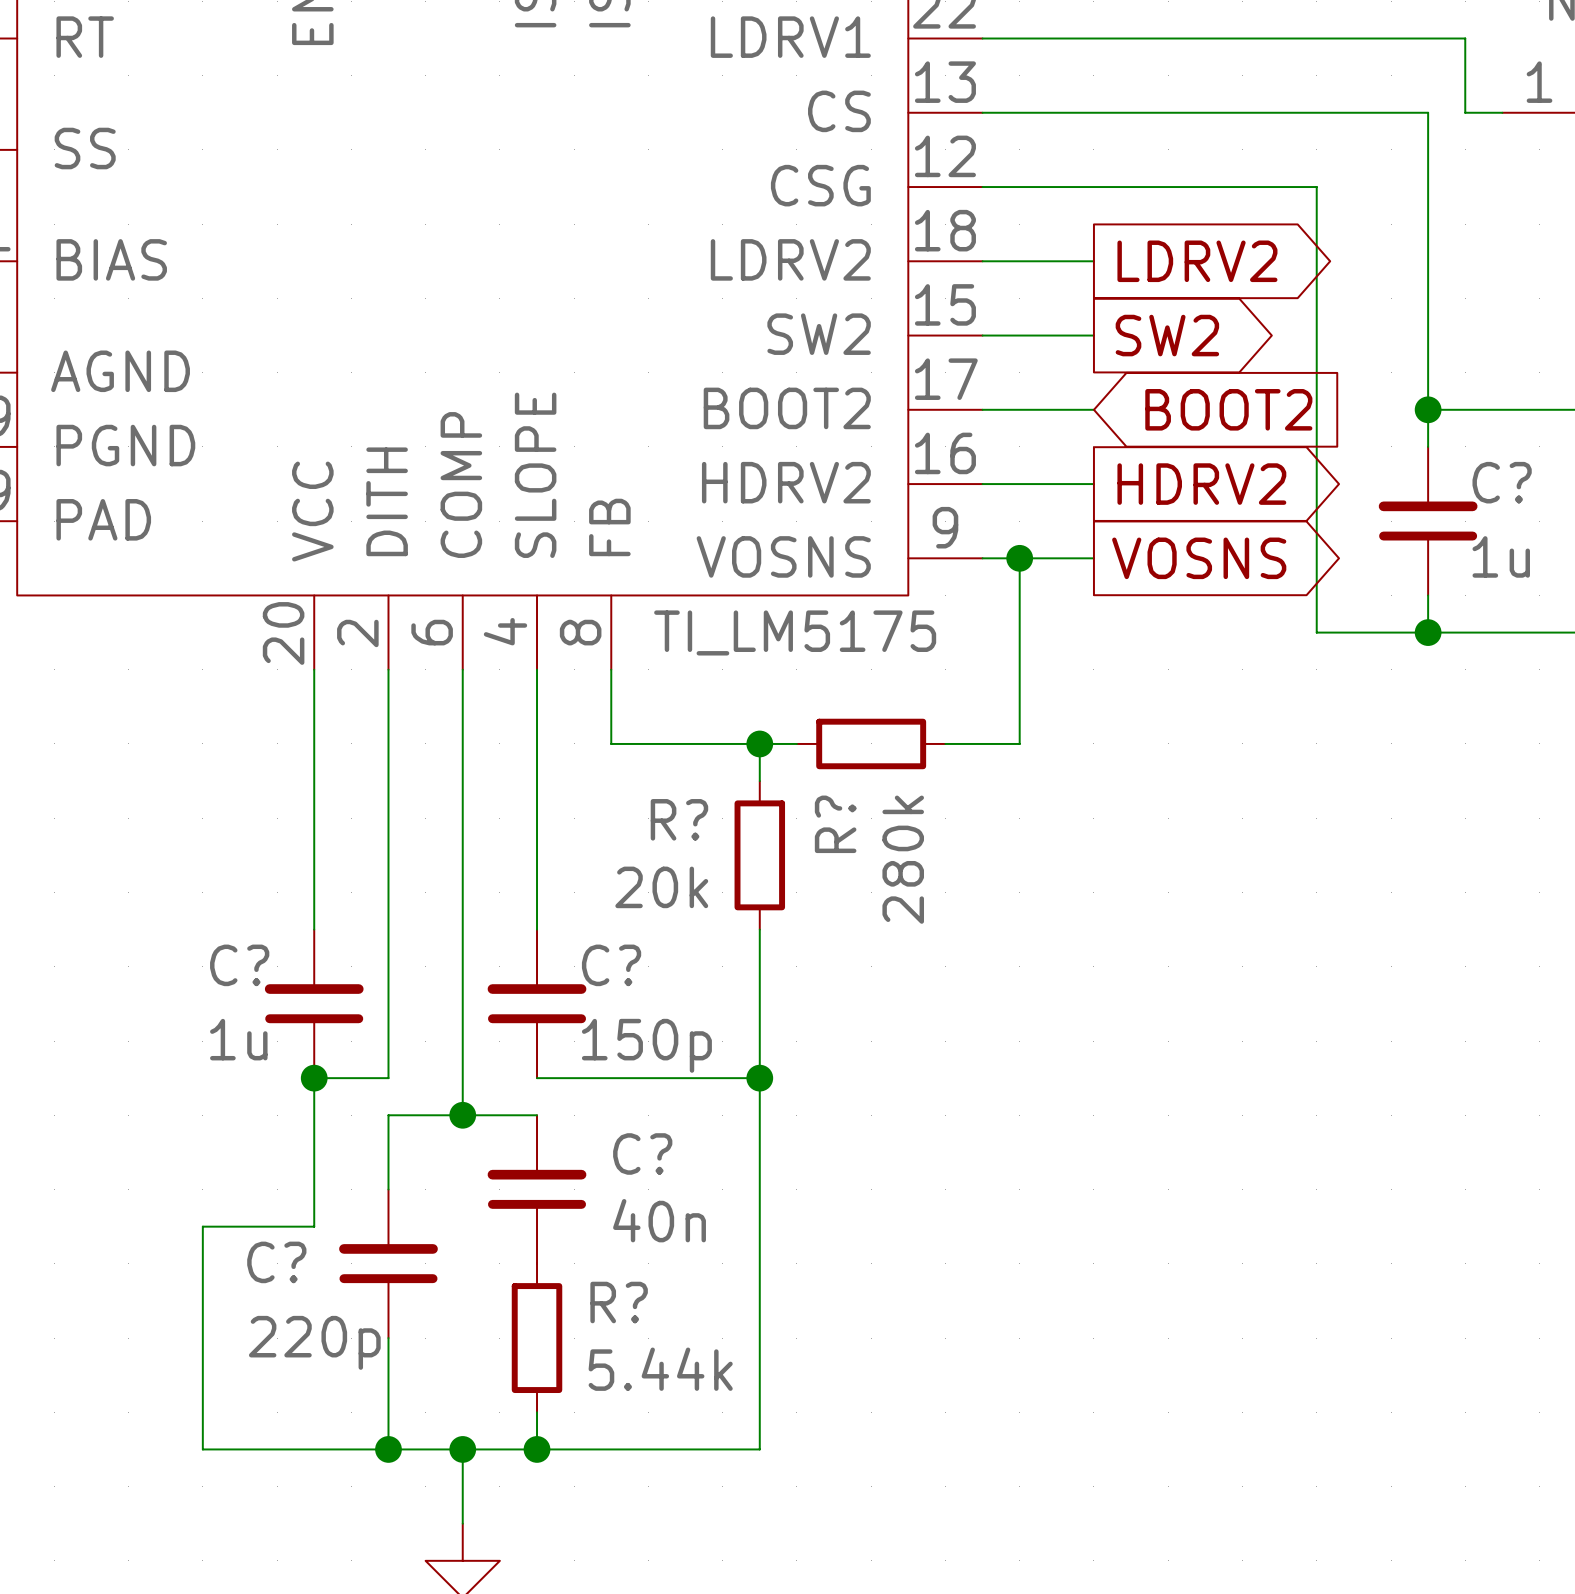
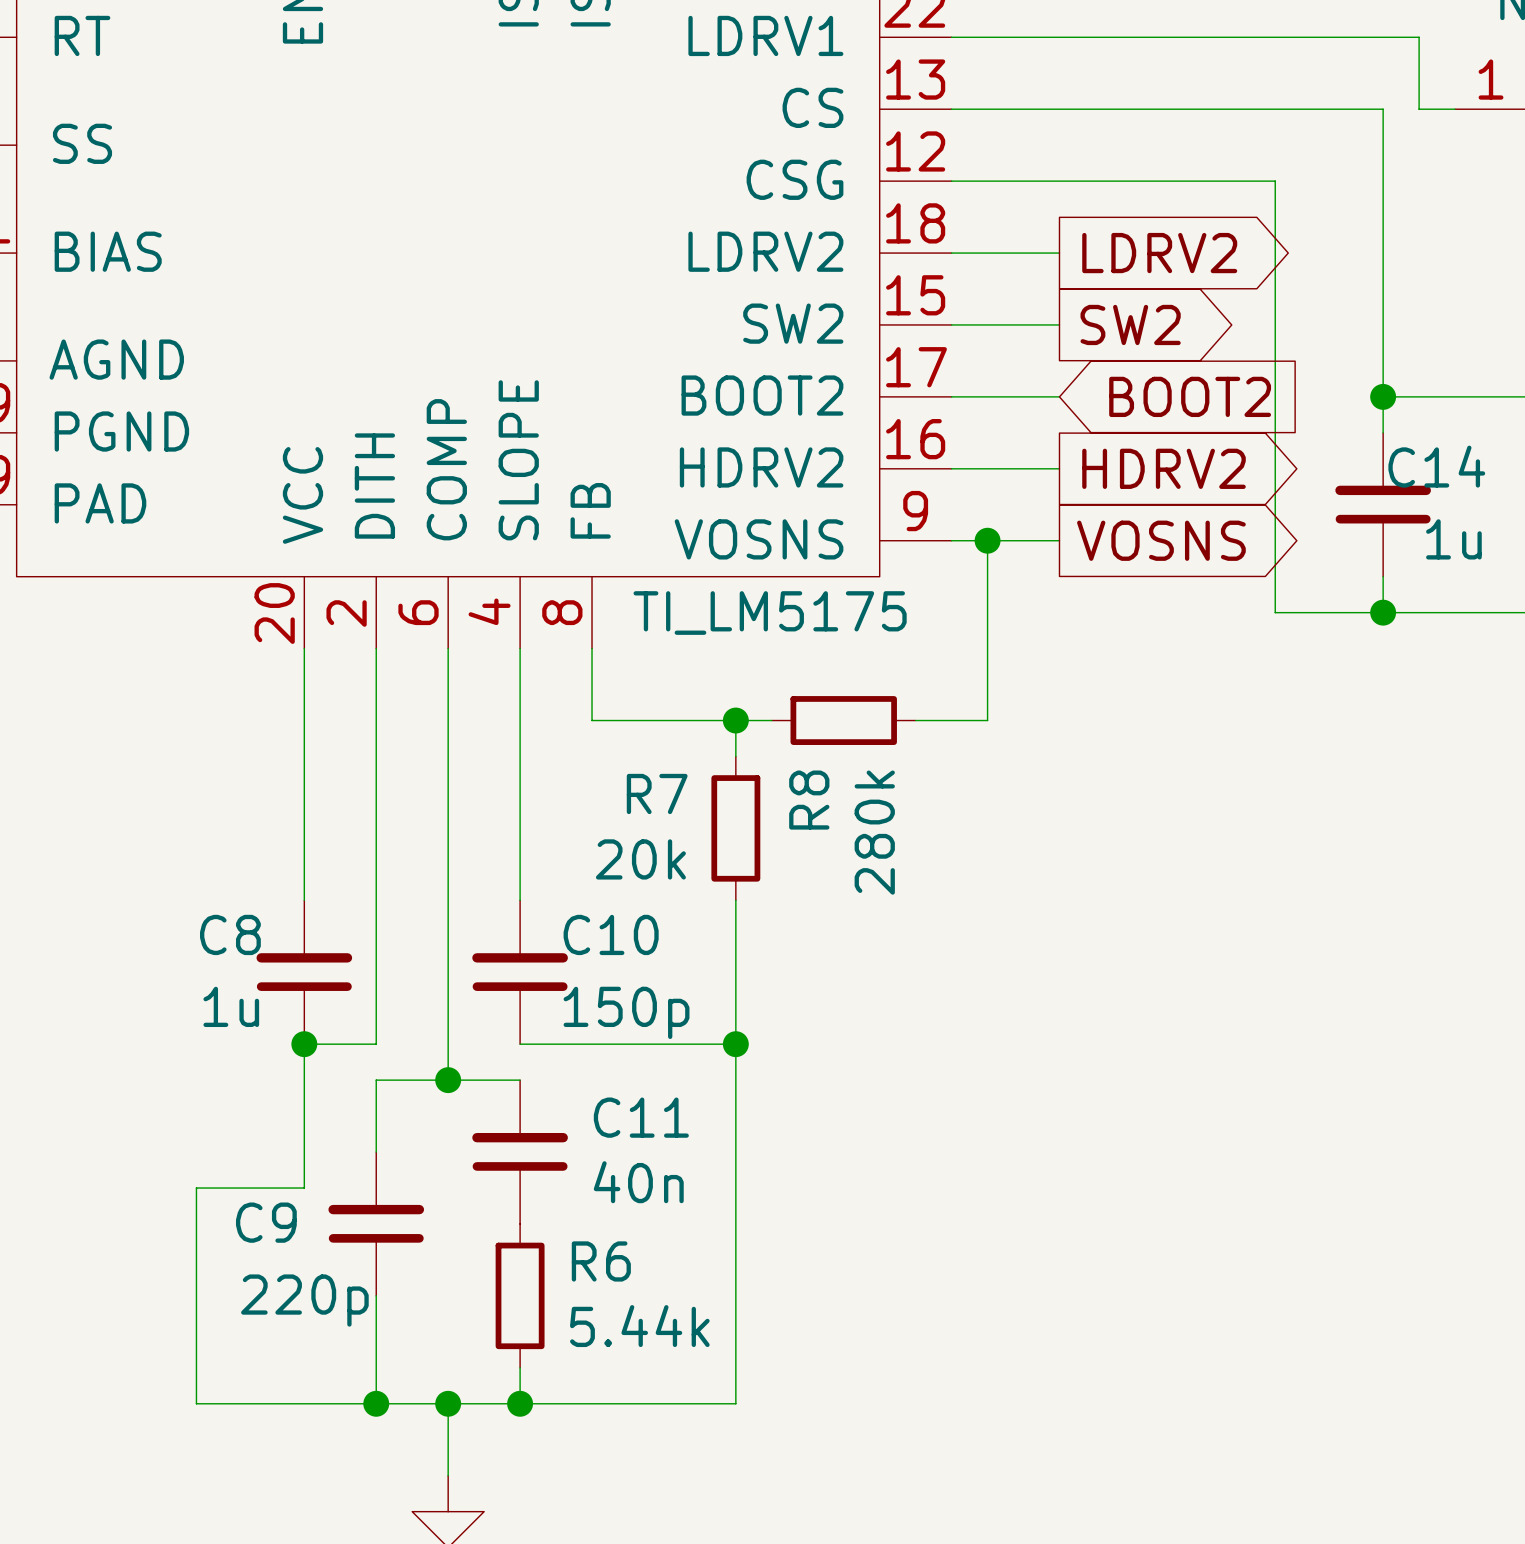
C? name: C? (1502, 482) -> C14 (1436, 466)
R? name: R? (679, 819) -> R7 (657, 793)
R? name: R? (835, 824) -> R8 (809, 800)
C? name: C? (239, 965) -> C8 (230, 934)
C? name: C? (611, 965) -> C10 (611, 934)
C? name: C? (642, 1153) -> C11 (641, 1117)
C? name: C? (276, 1262) -> C9 (266, 1222)
R? name: R? (619, 1302) -> R6 (601, 1261)

